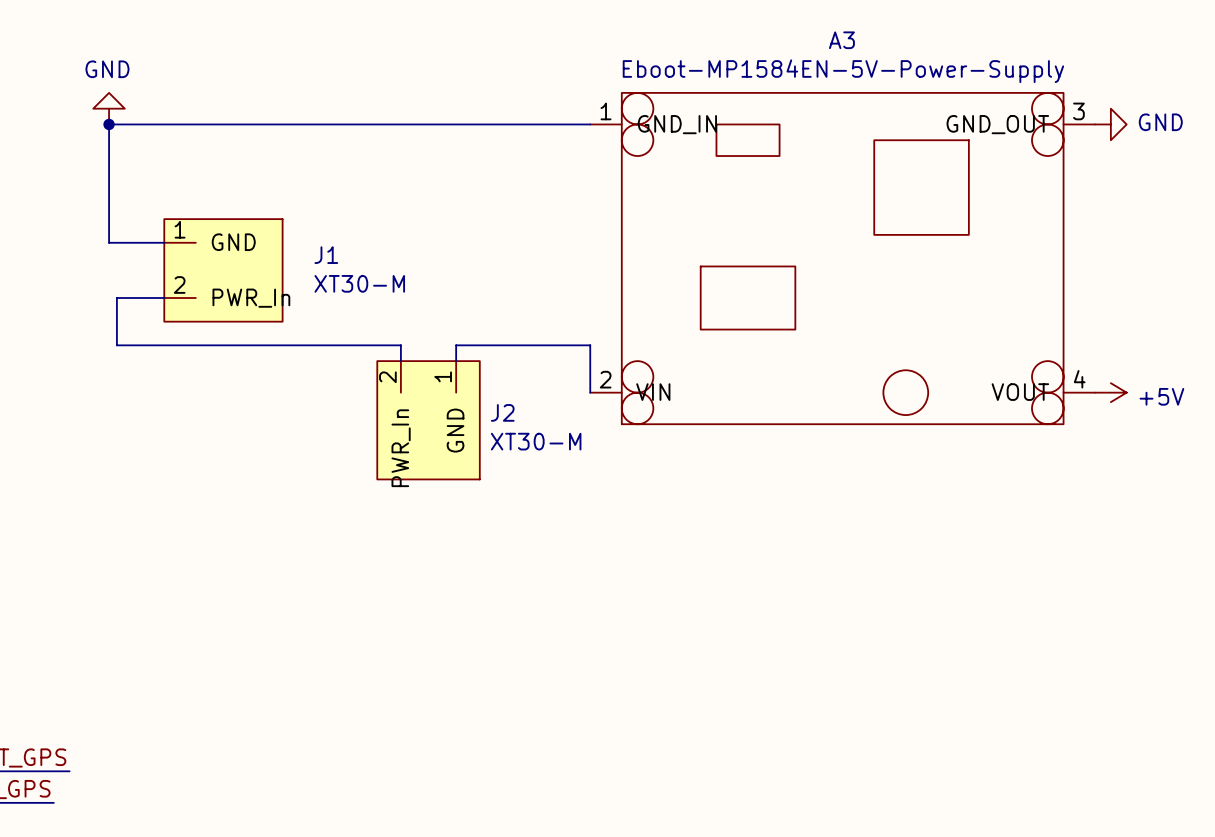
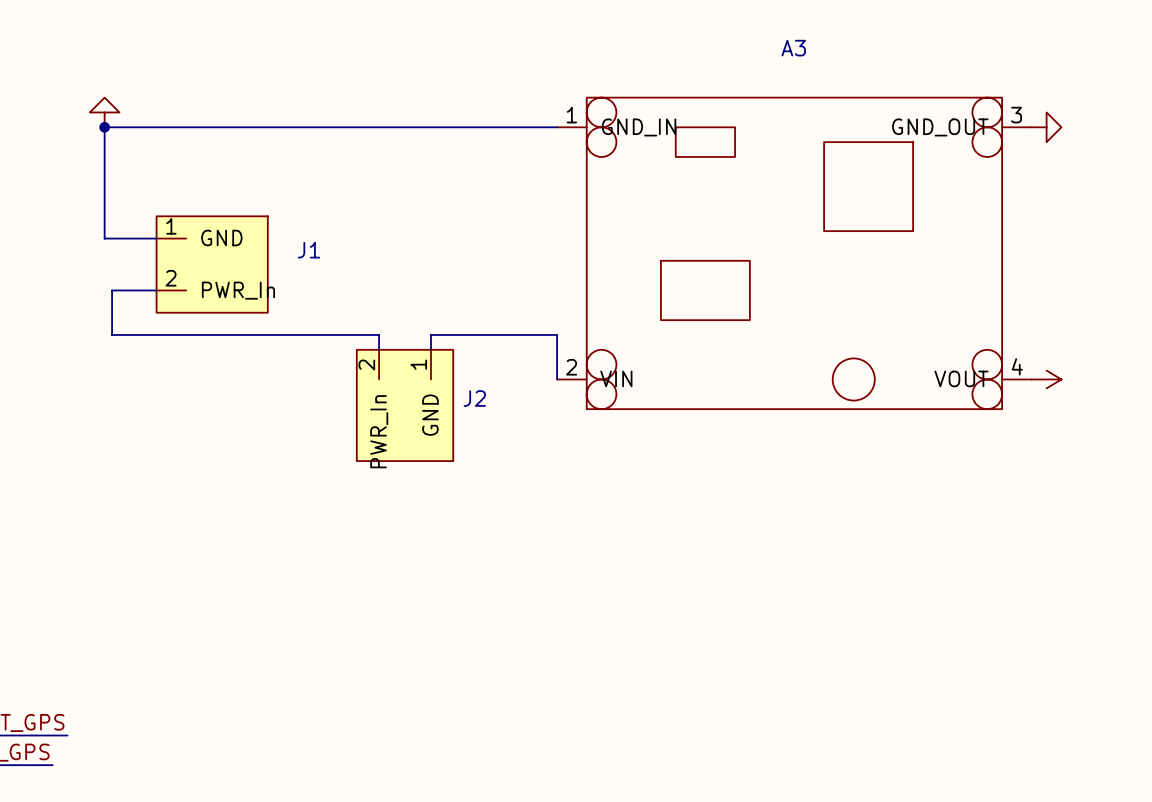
power symbol text: GND (107, 69) -> none
A3 value: Eboot-MP1584EN-5V-Power-Supply (843, 71) -> none
power symbol text: GND (1160, 122) -> none
J1 value: XT30-M (359, 283) -> none
power symbol text: +5V (1161, 396) -> none
J2 value: XT30-M (536, 441) -> none

